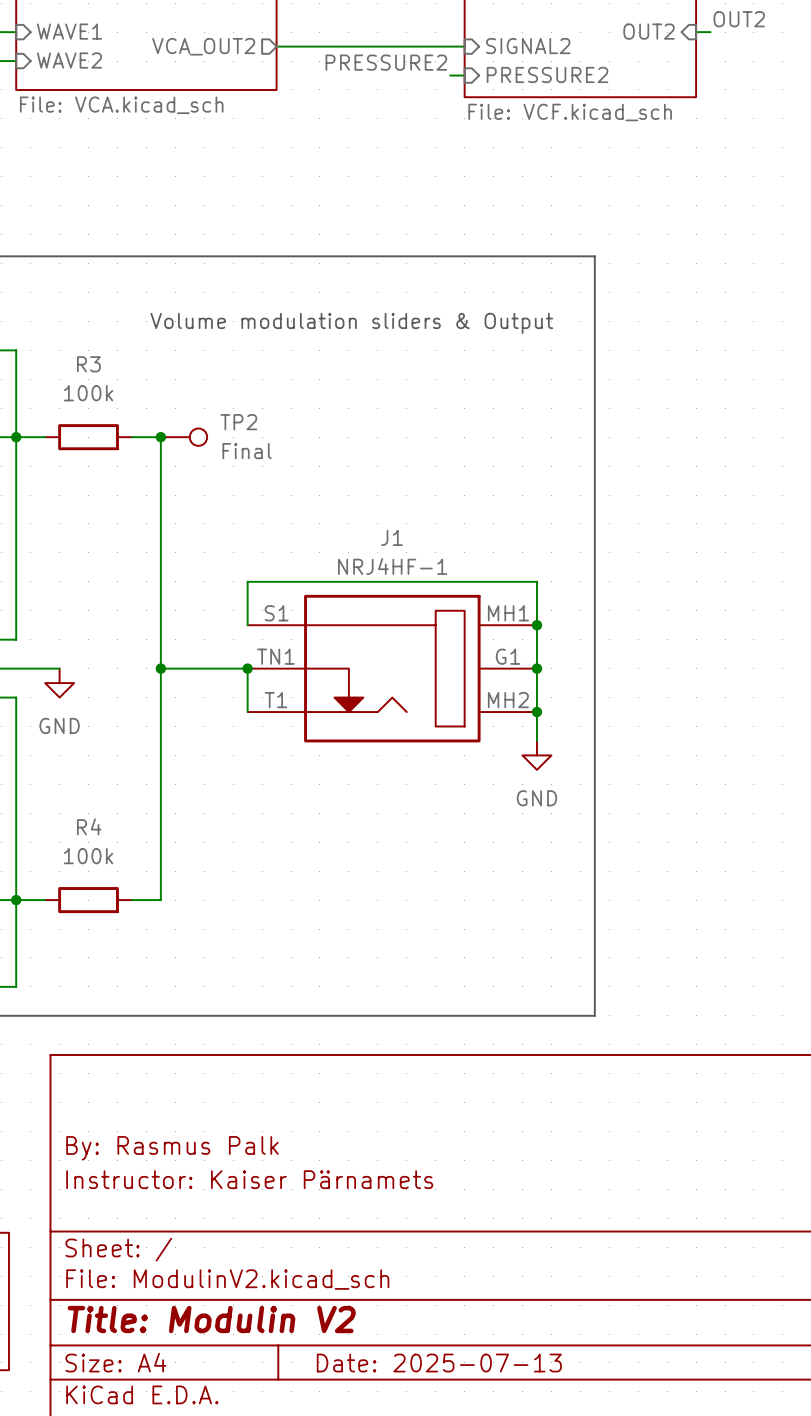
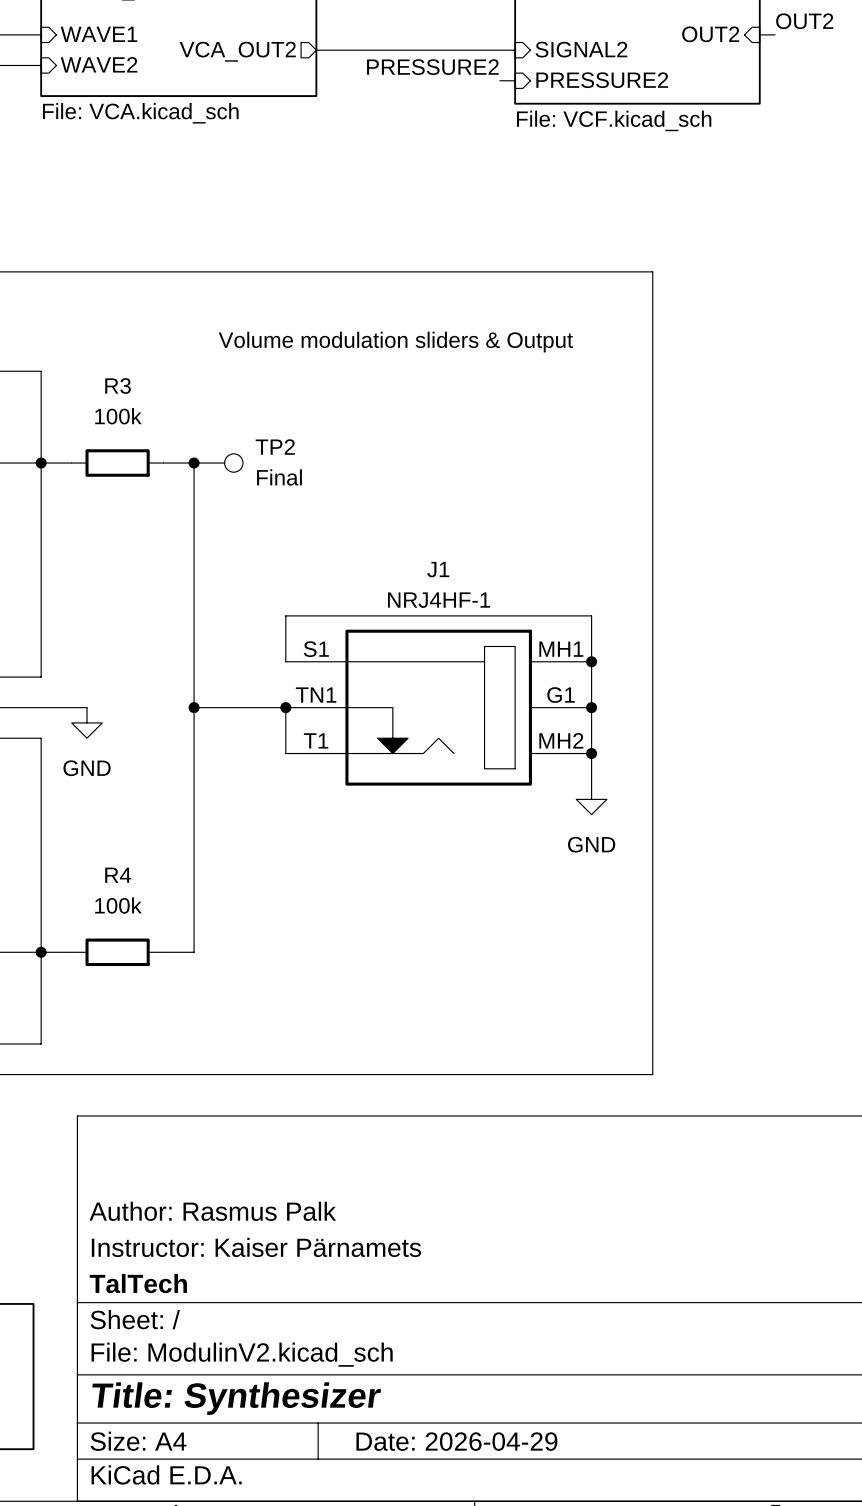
title block: By: Rasmus Palk (172, 1148) -> Author: Rasmus Palk (212, 1211)
title block: none -> TalTech (138, 1283)
title block: Title: Modulin V2 (211, 1319) -> Title: Synthesizer (236, 1398)
title block: Date: 2025-07-13 (439, 1363) -> Date: 2026-04-29 (456, 1441)

